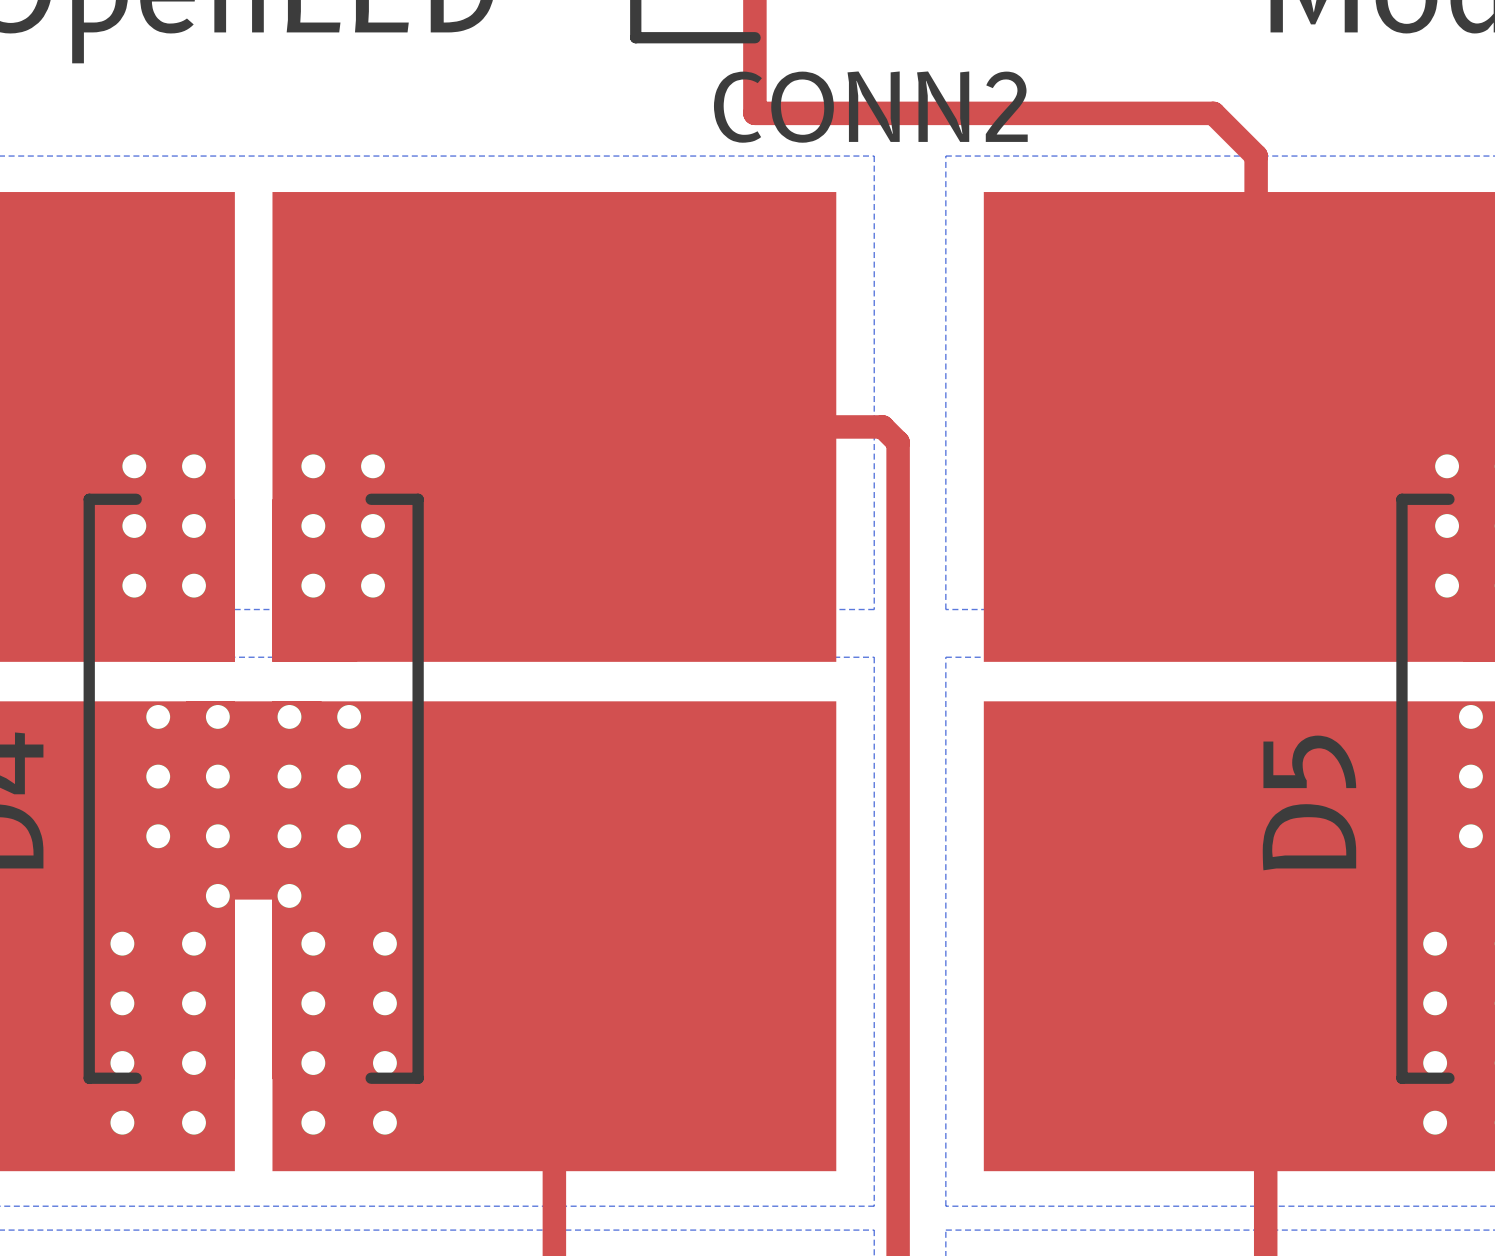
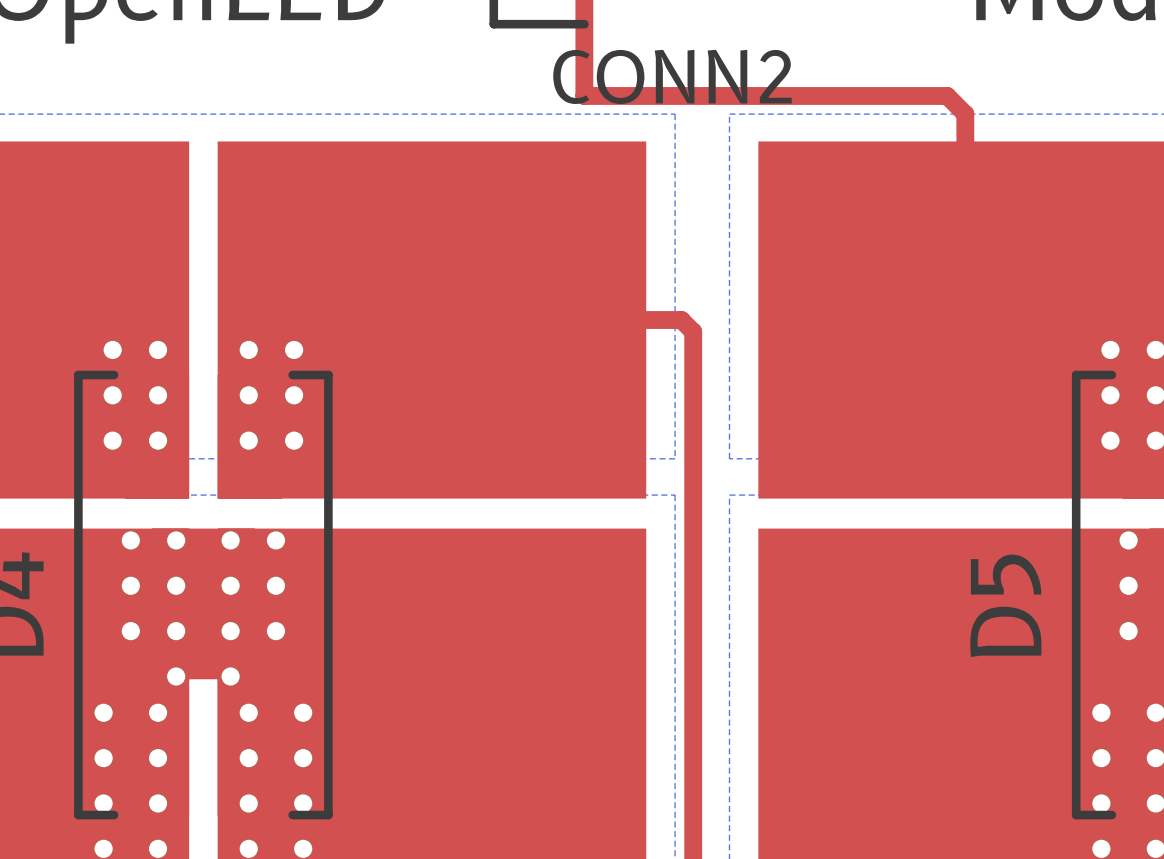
top track: (754, 113) (1213, 113) (1232, 132) -> (584, 81) (584, 95) (947, 95)

